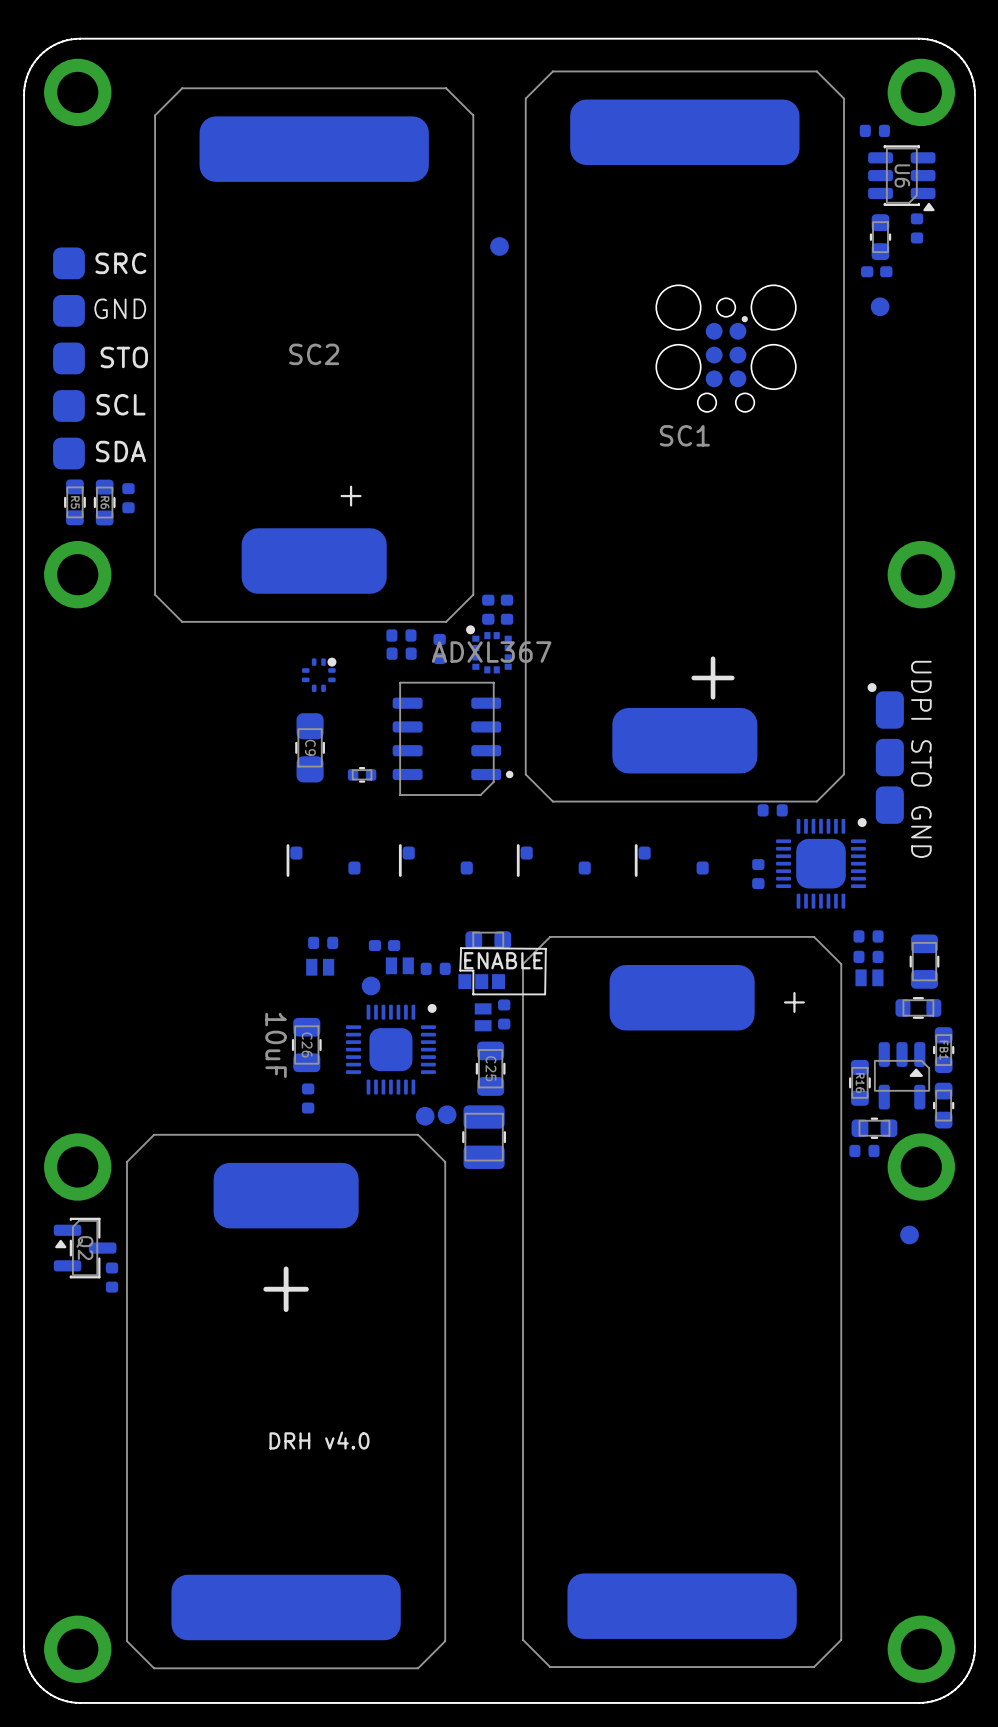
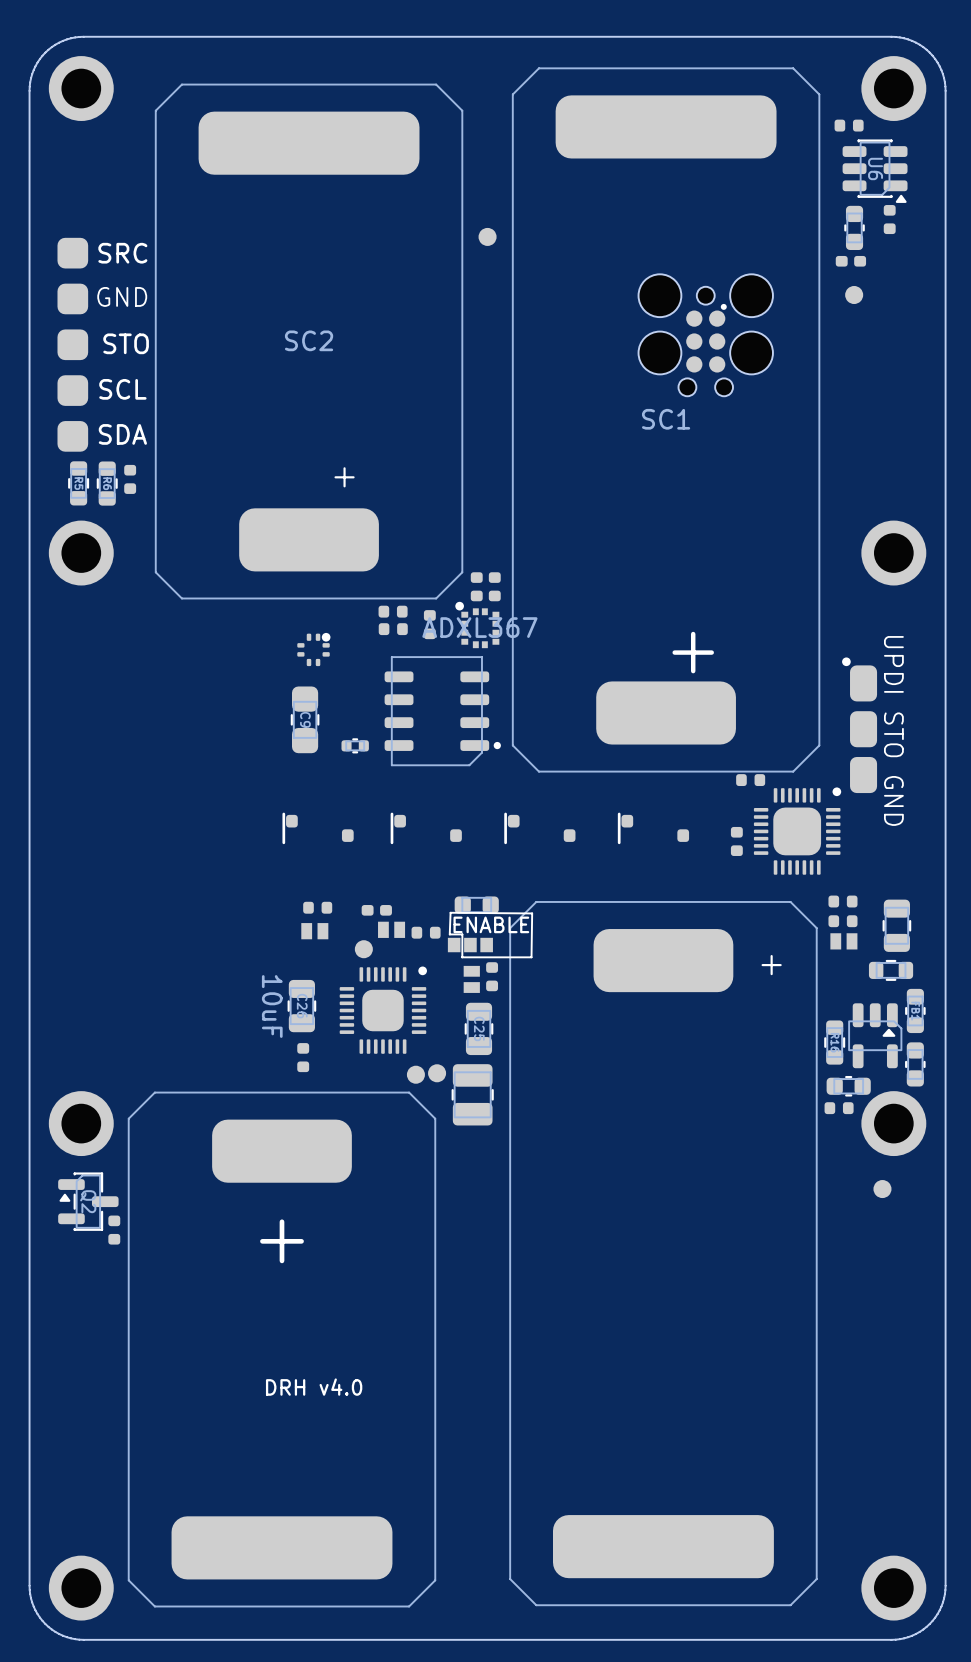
part text: UDPI STO GND (921, 759) -> UPDI STO GND (893, 730)

